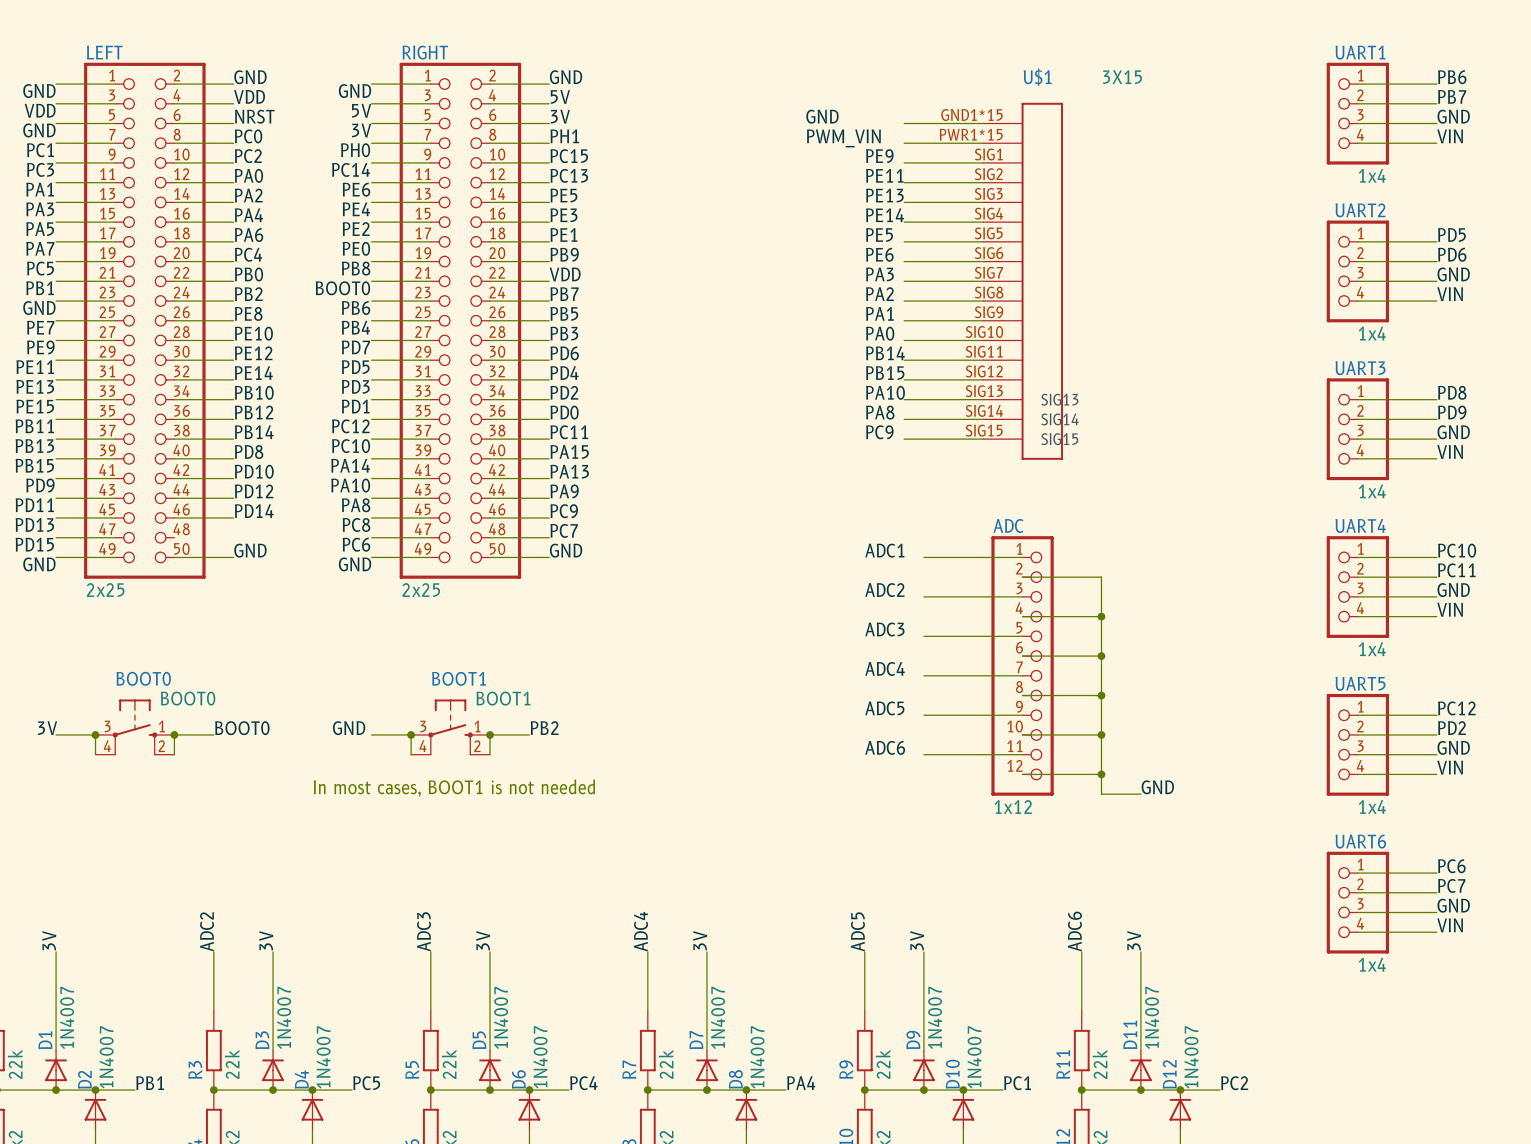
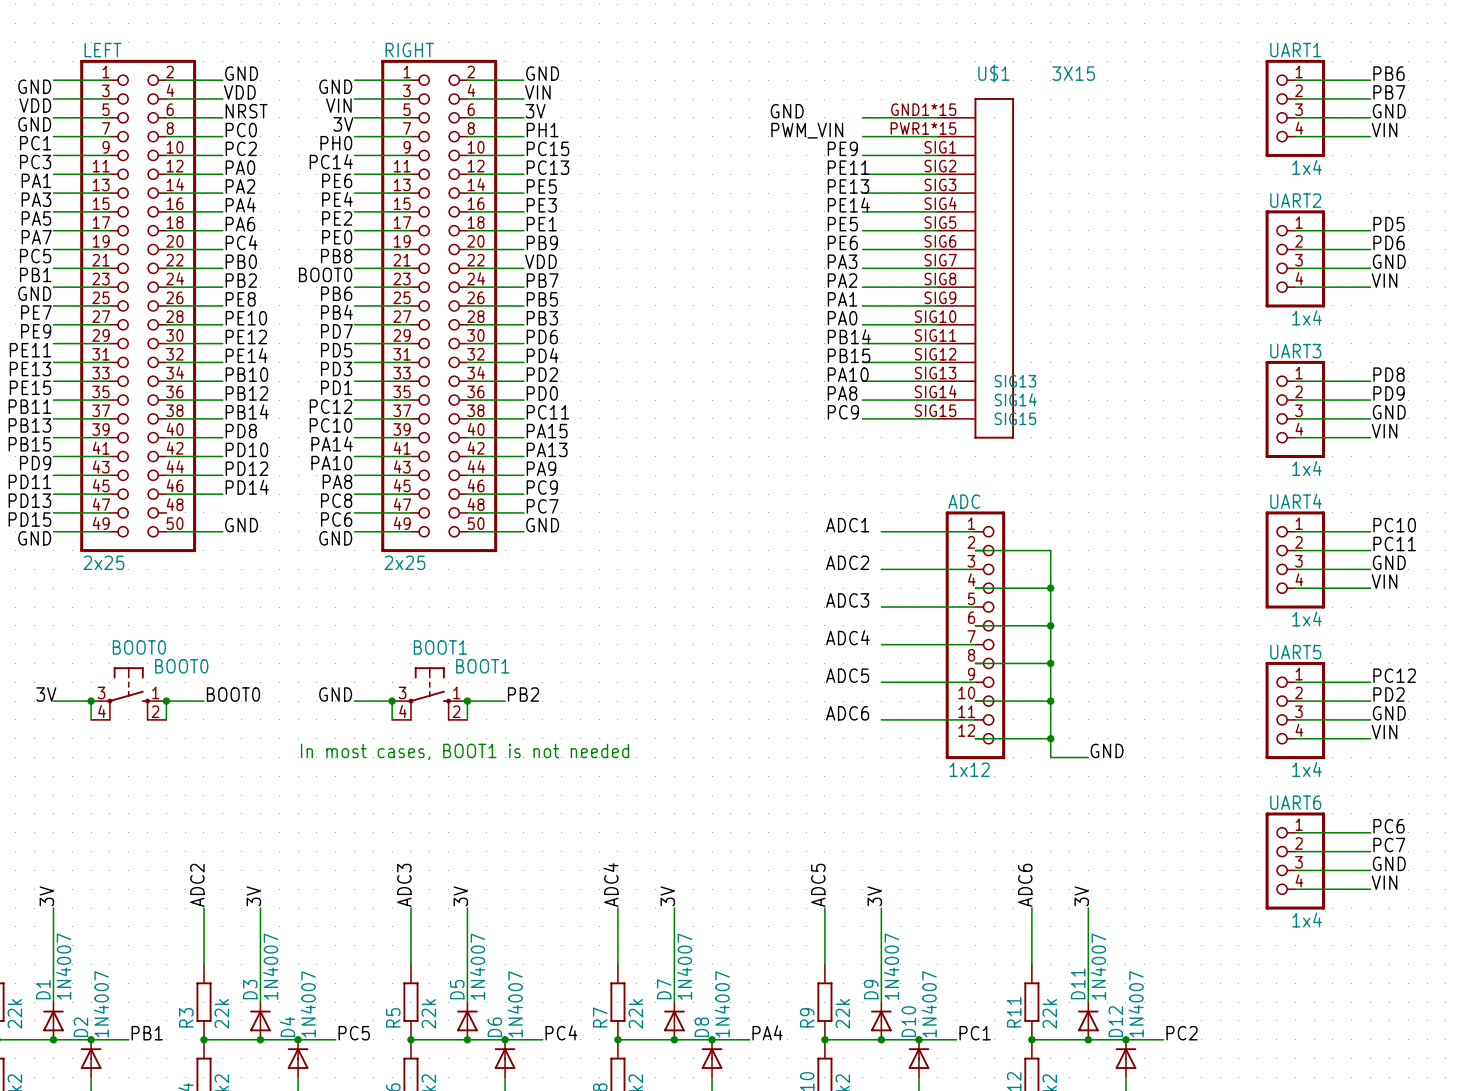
label: 5V (560, 96) -> VIN (537, 92)
label: 5V (361, 110) -> VIN (338, 105)

